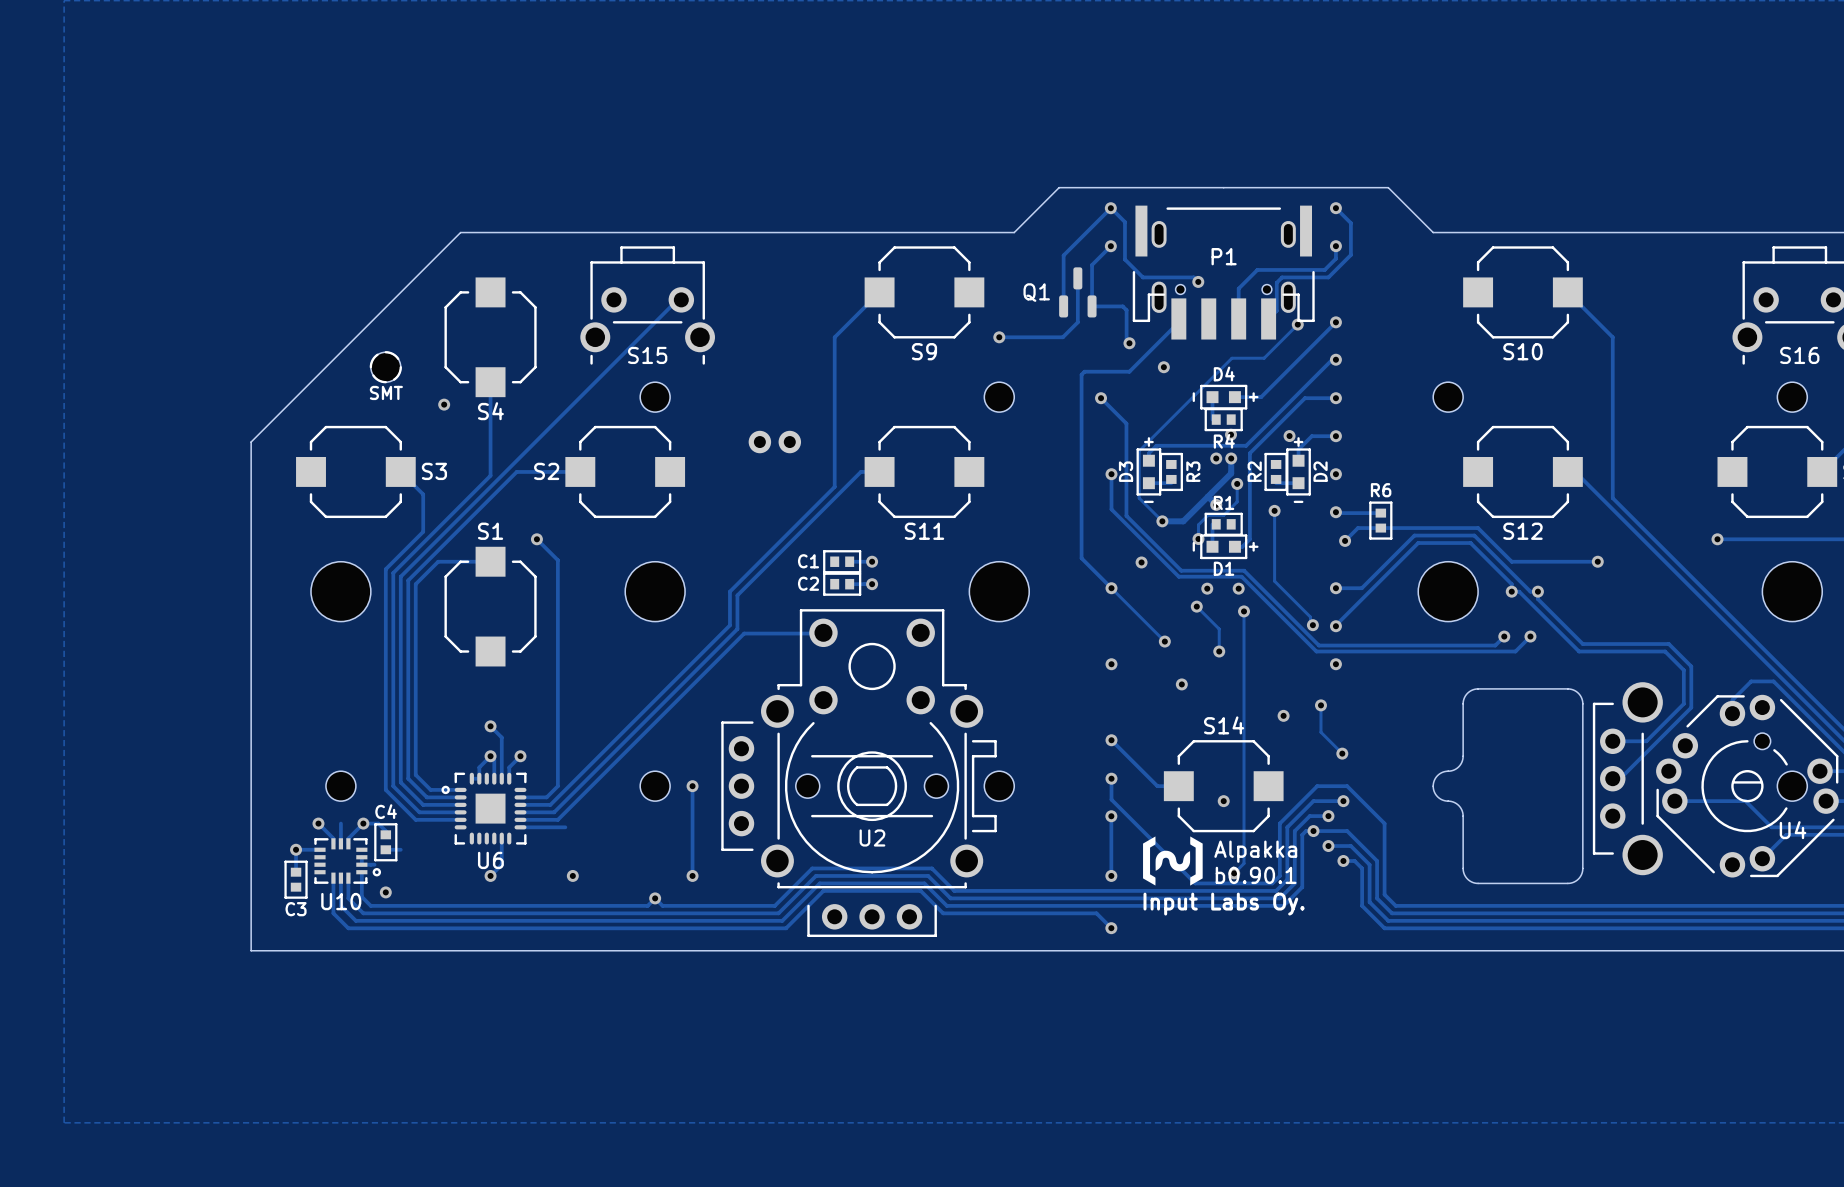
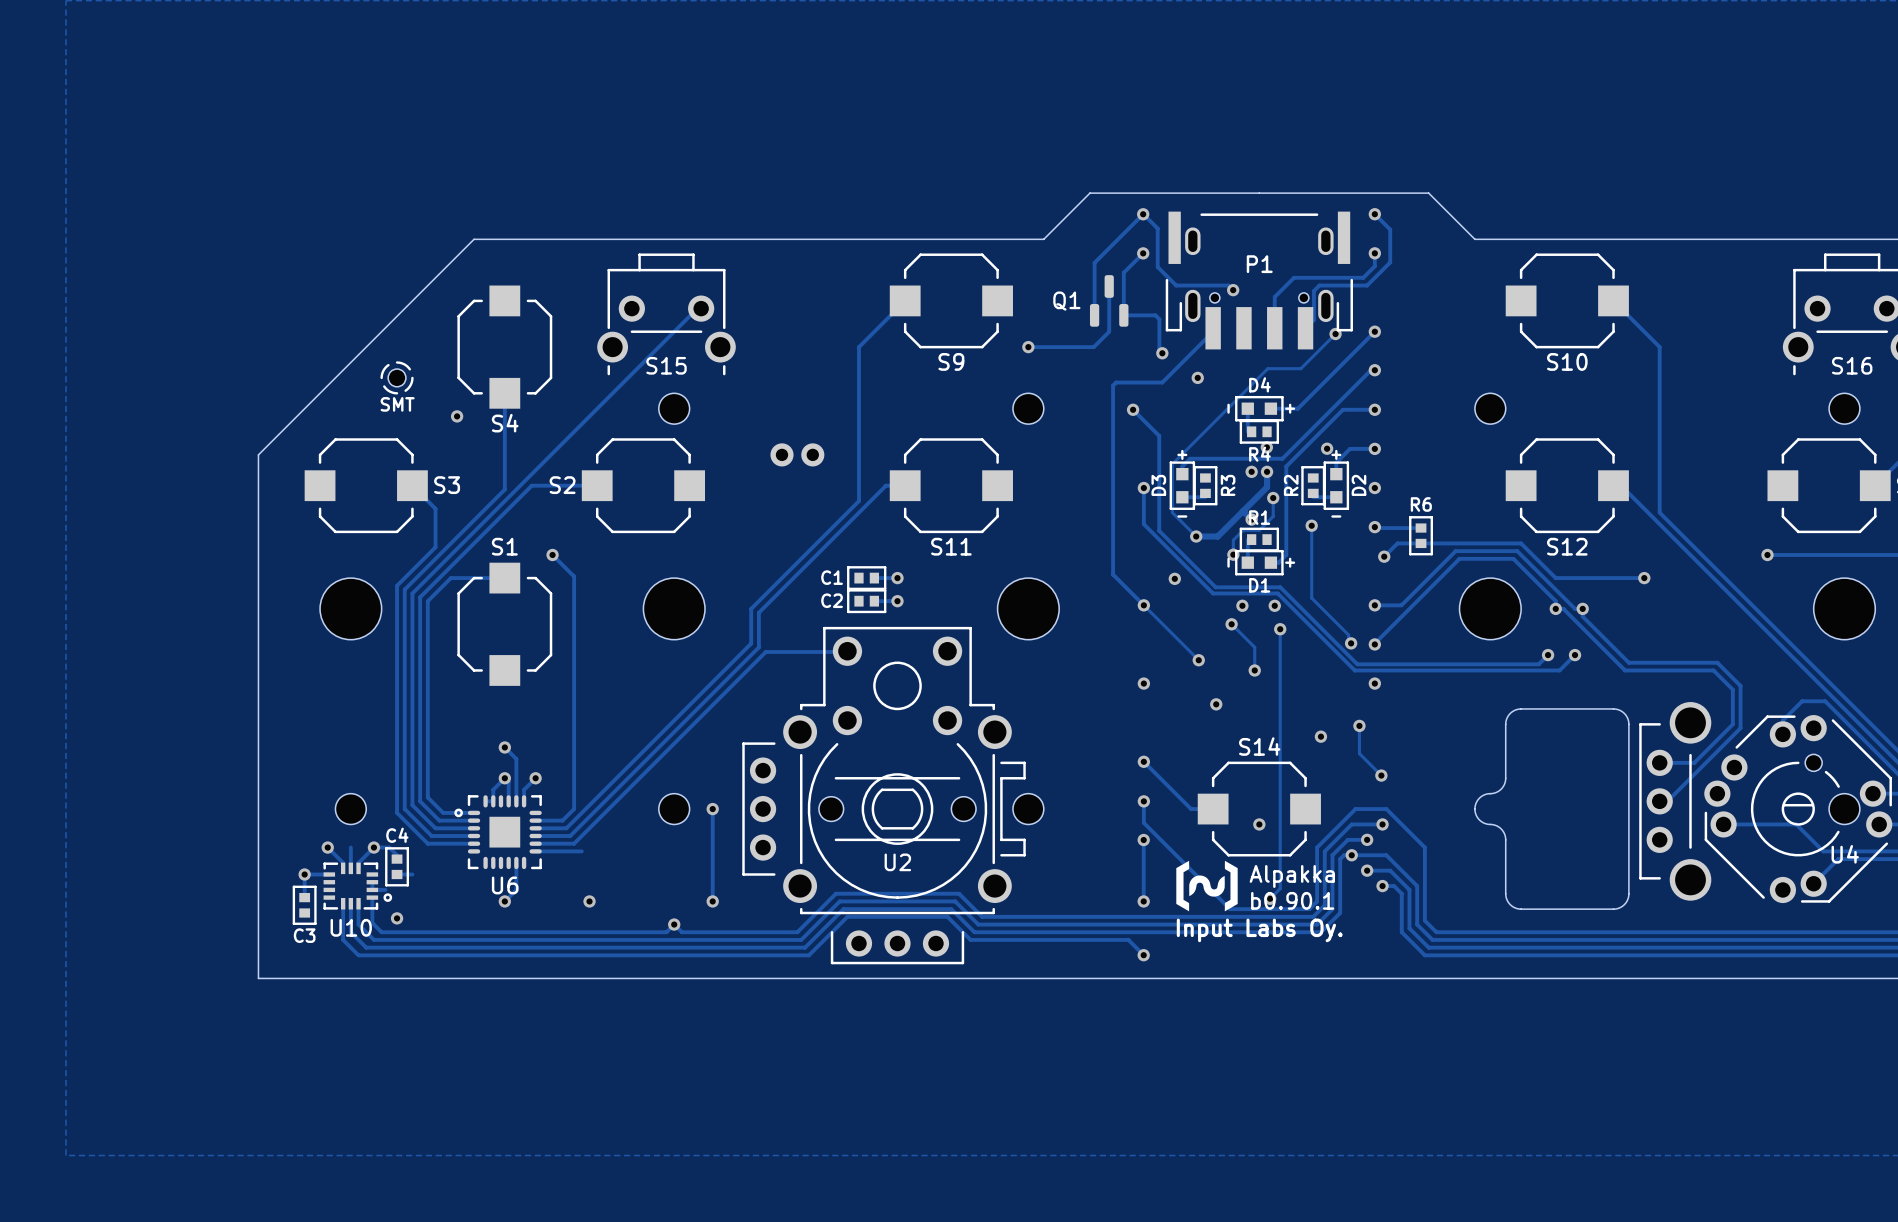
P1 footprint: [1132, 205, 1315, 340] -> [1165, 211, 1353, 350]
part footprint: [370, 352, 401, 383] -> [388, 369, 406, 387]

